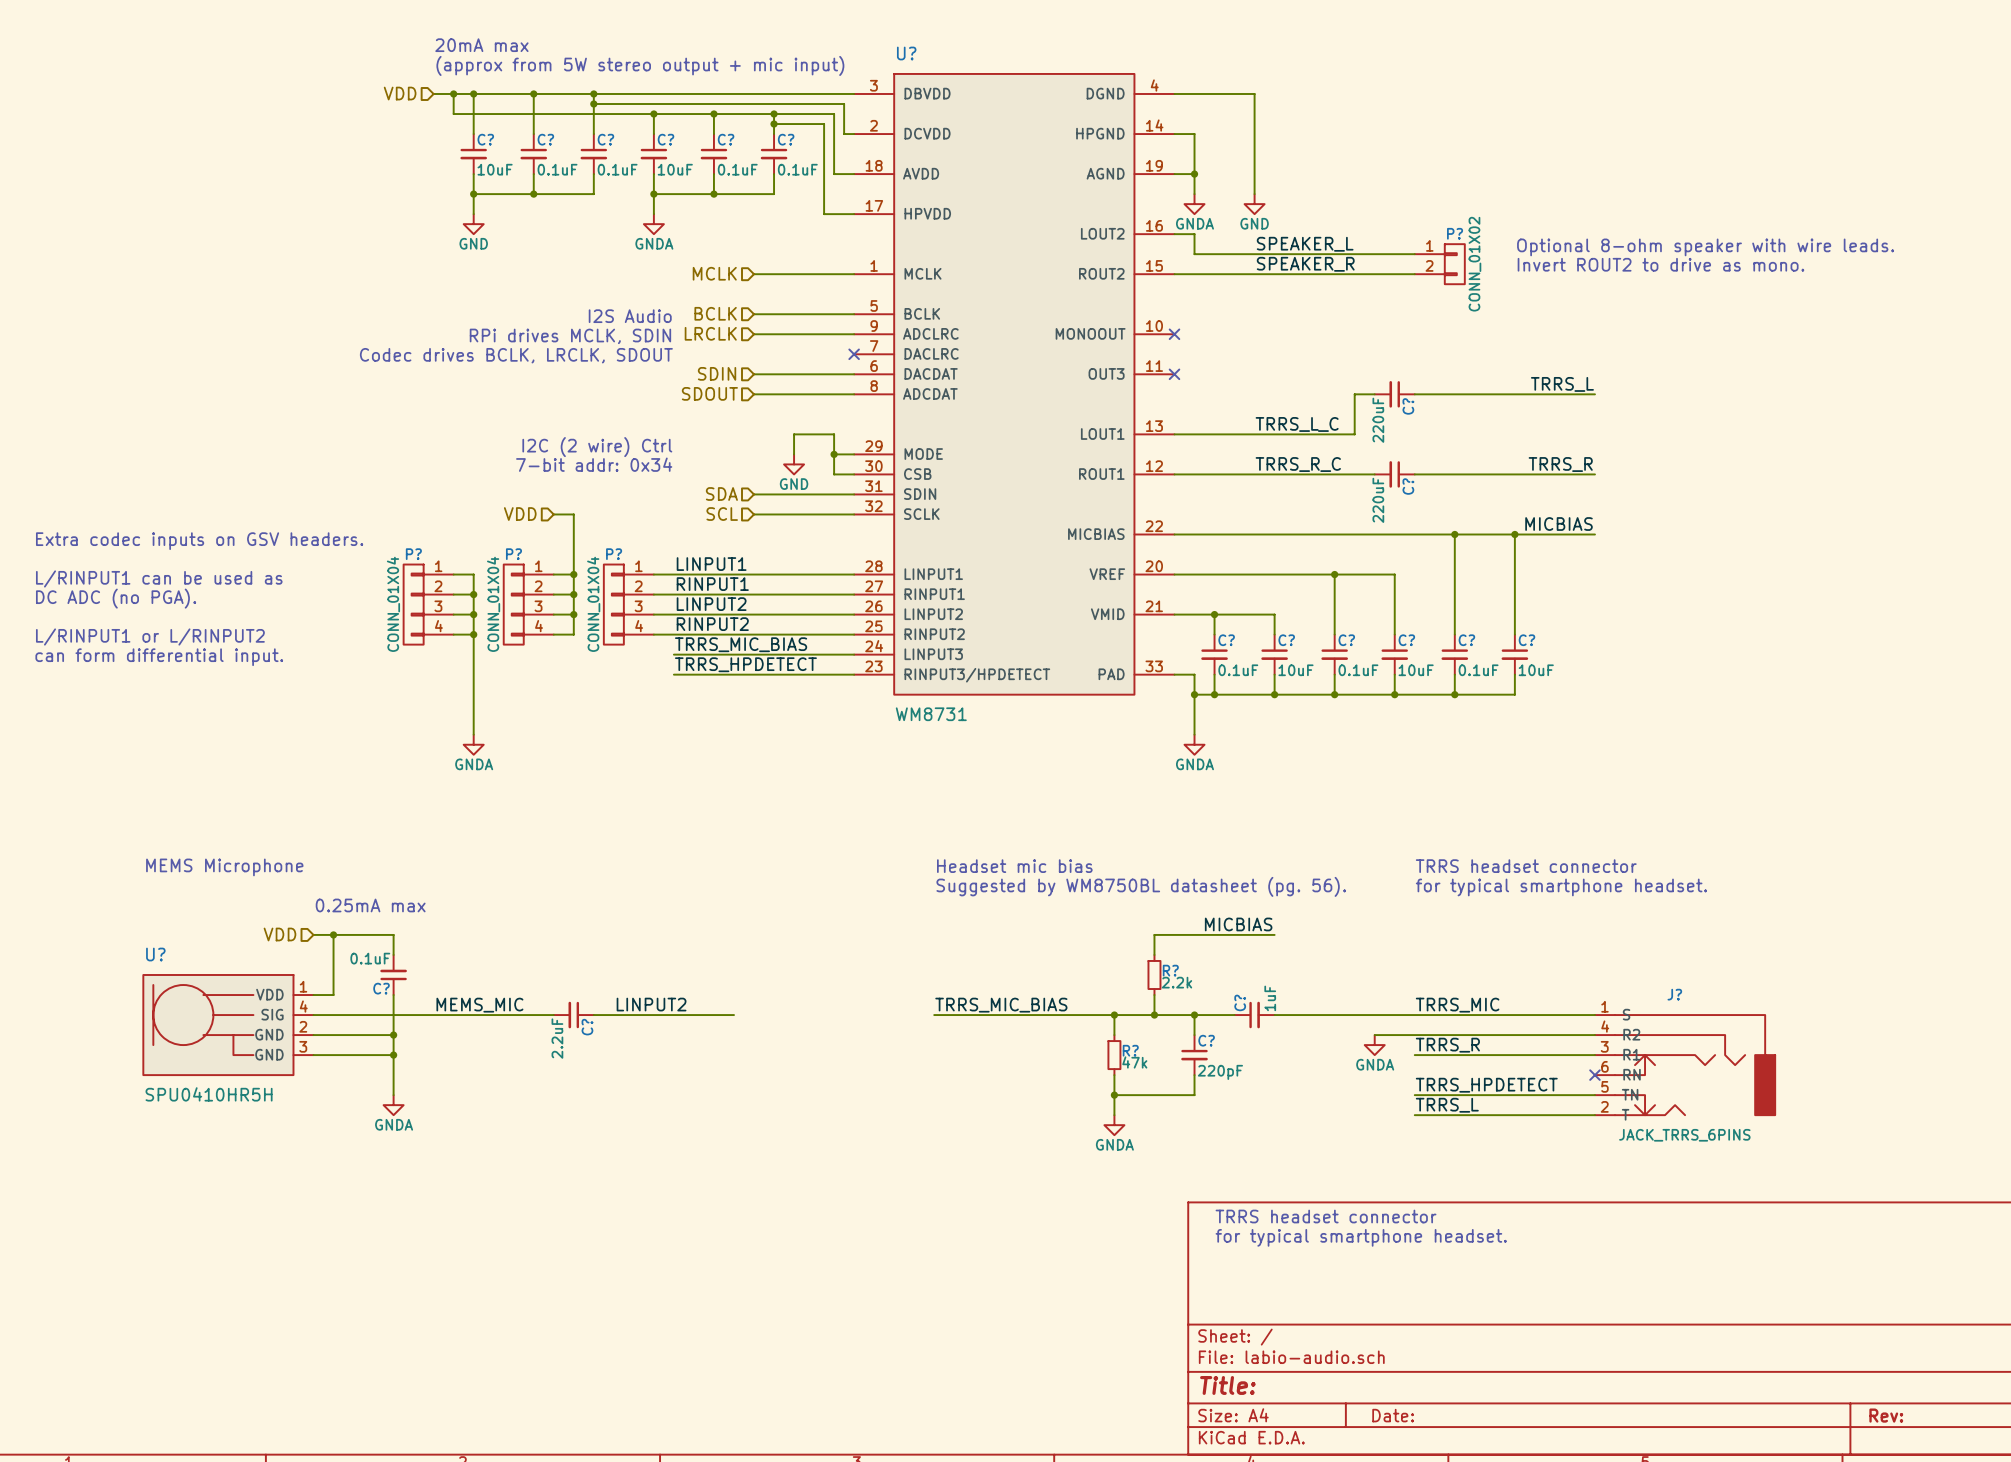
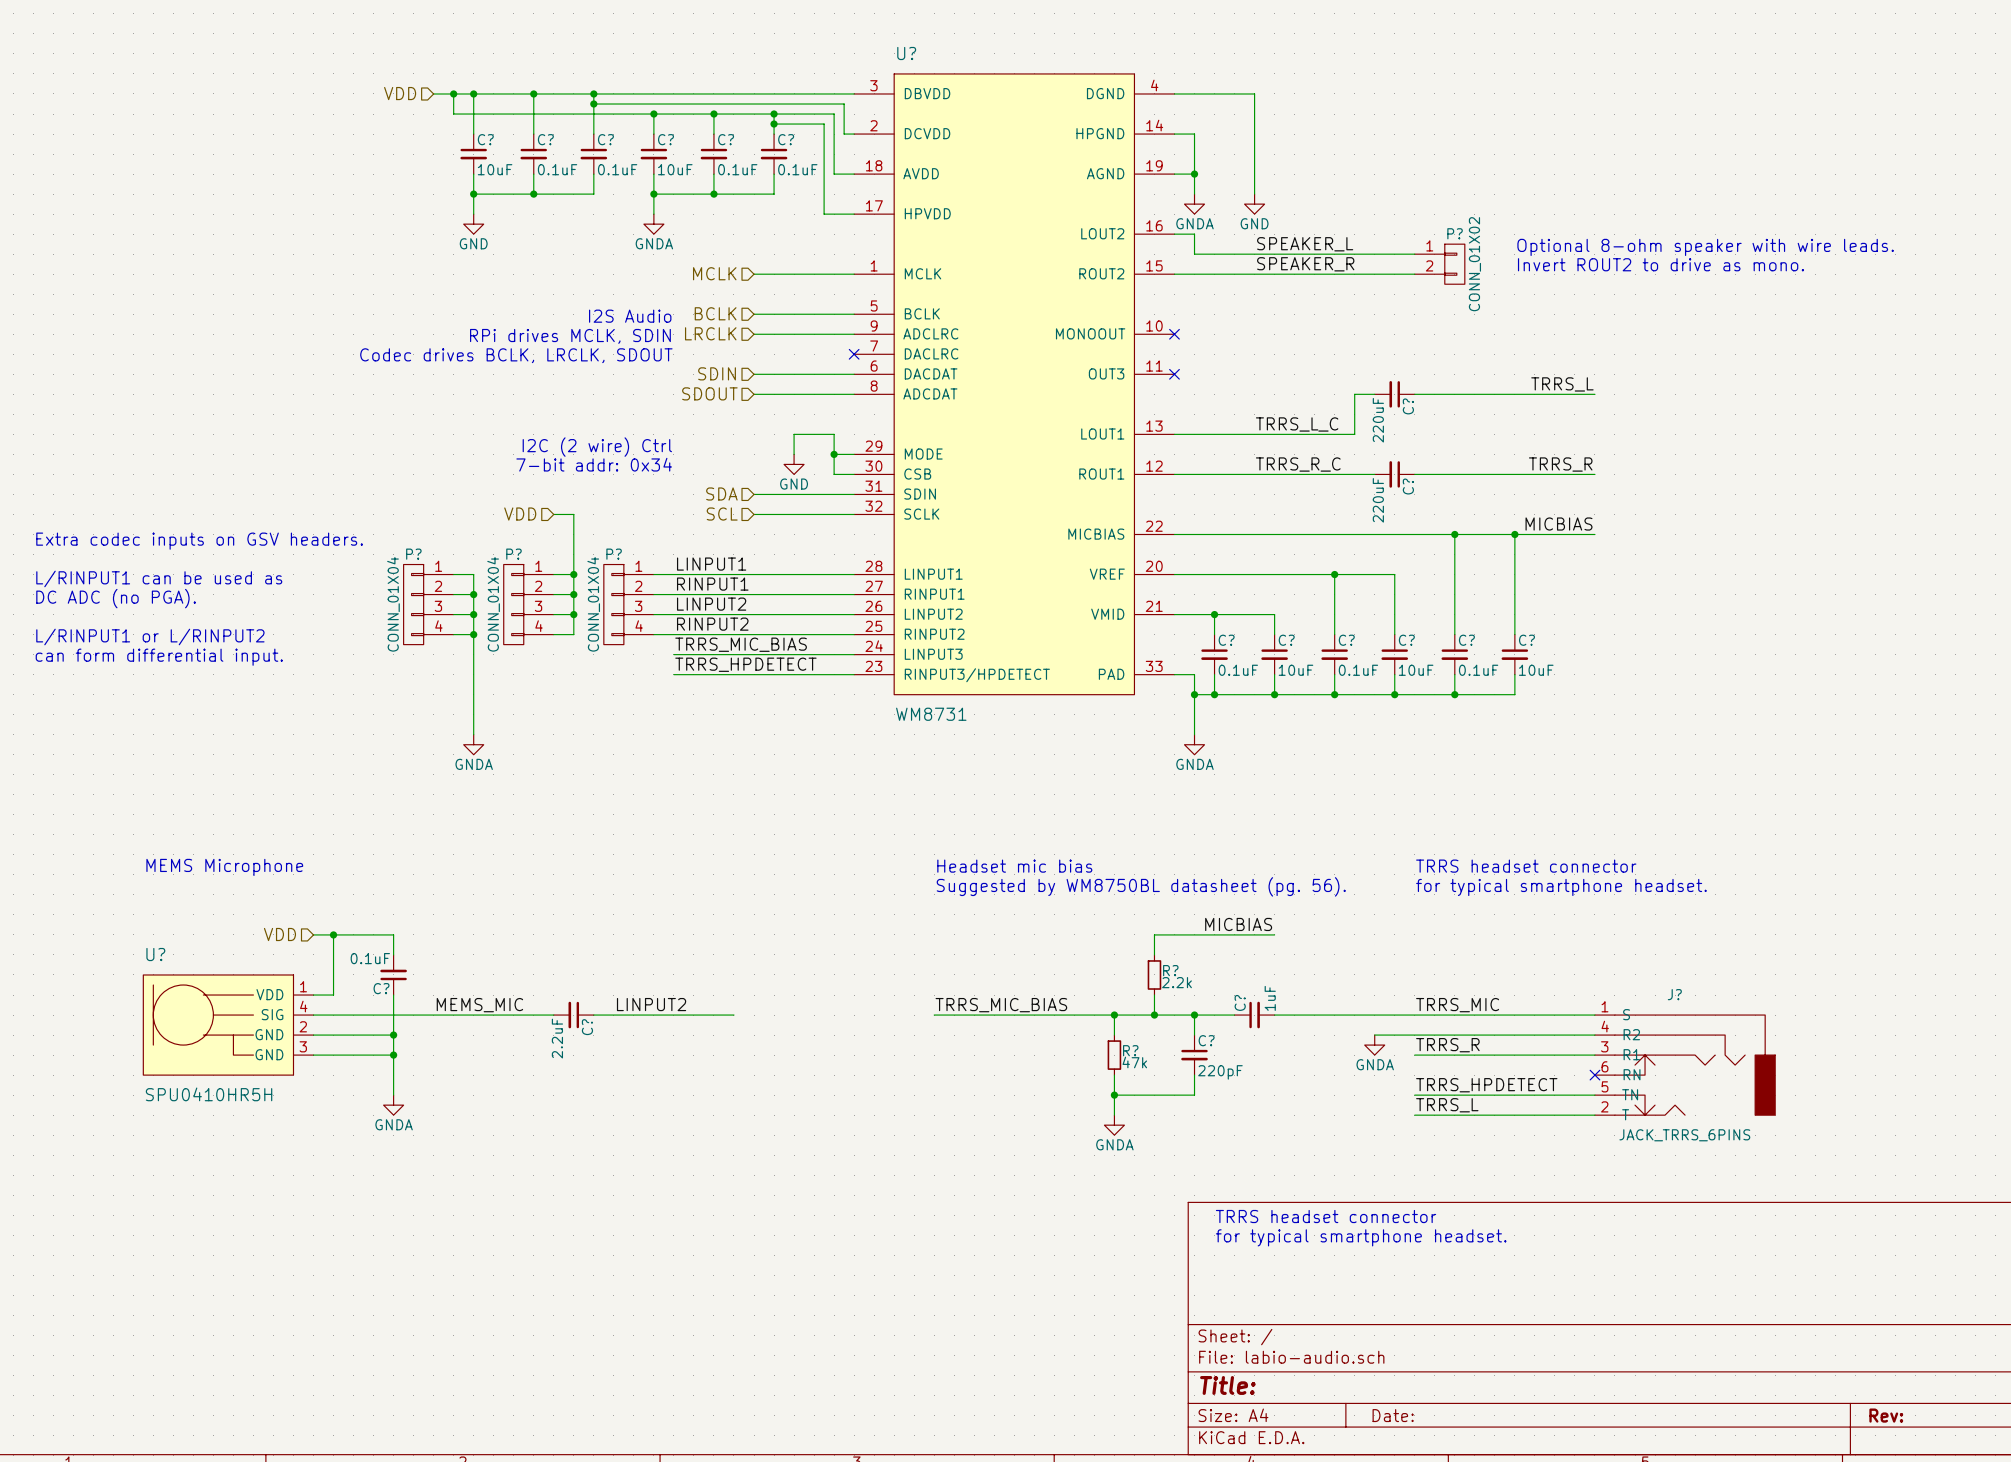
text: 20mA max (481, 45) -> none
text: (approx from 5W stereo output + mic input) (640, 65) -> none
text: 0.25mA max (370, 905) -> none

